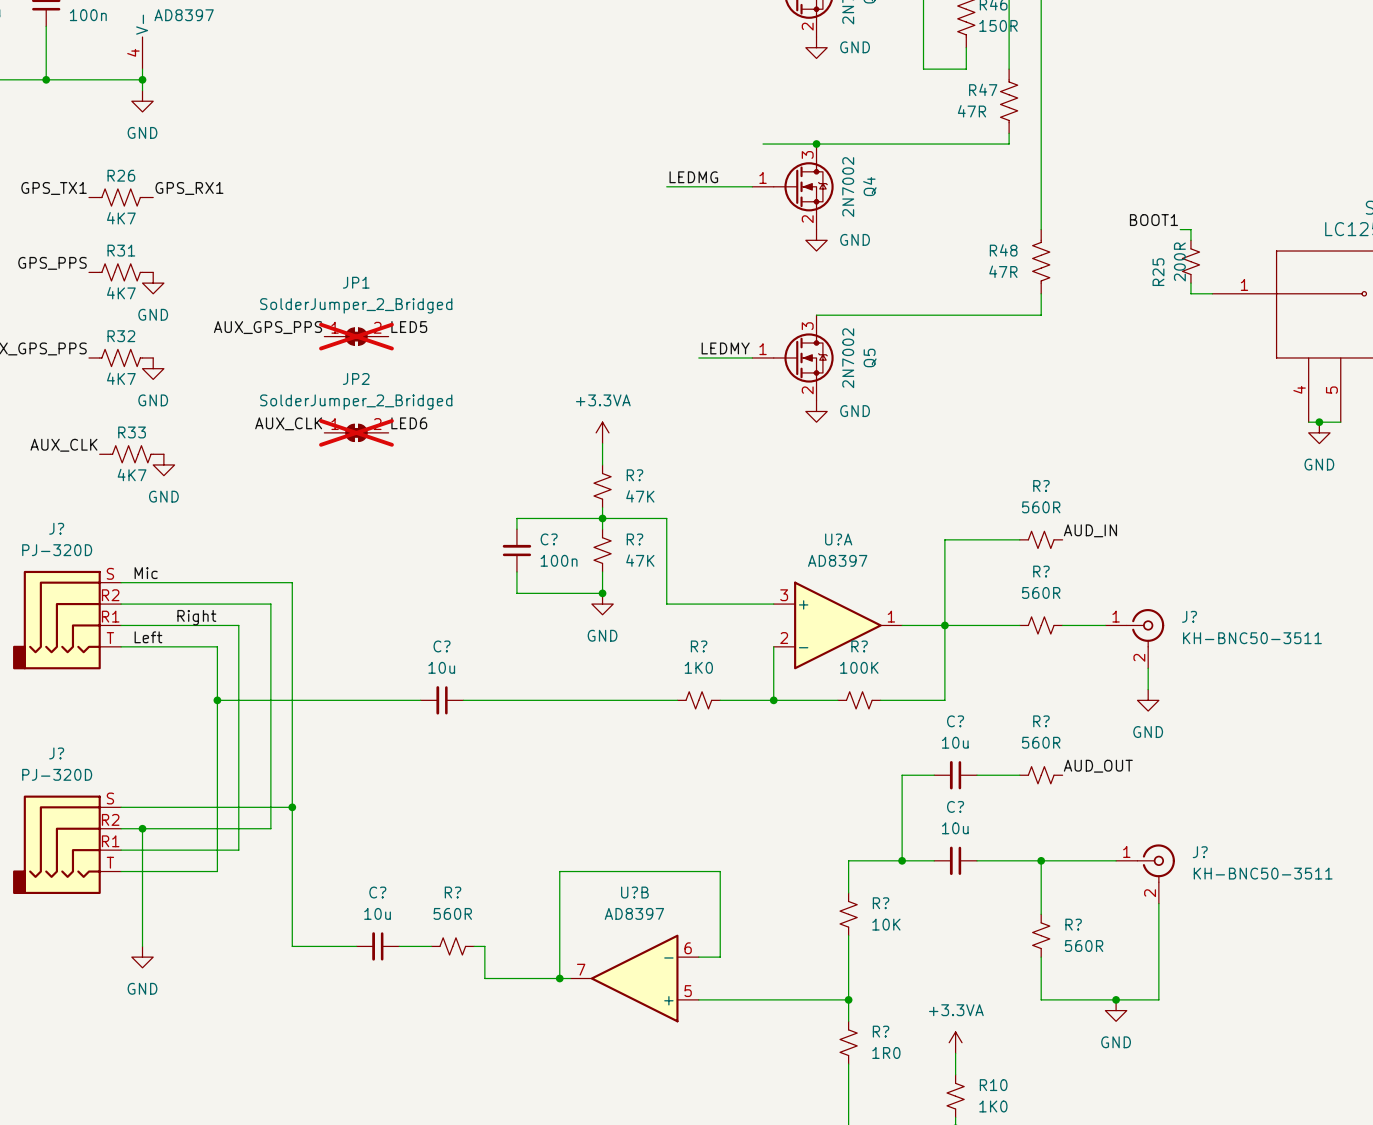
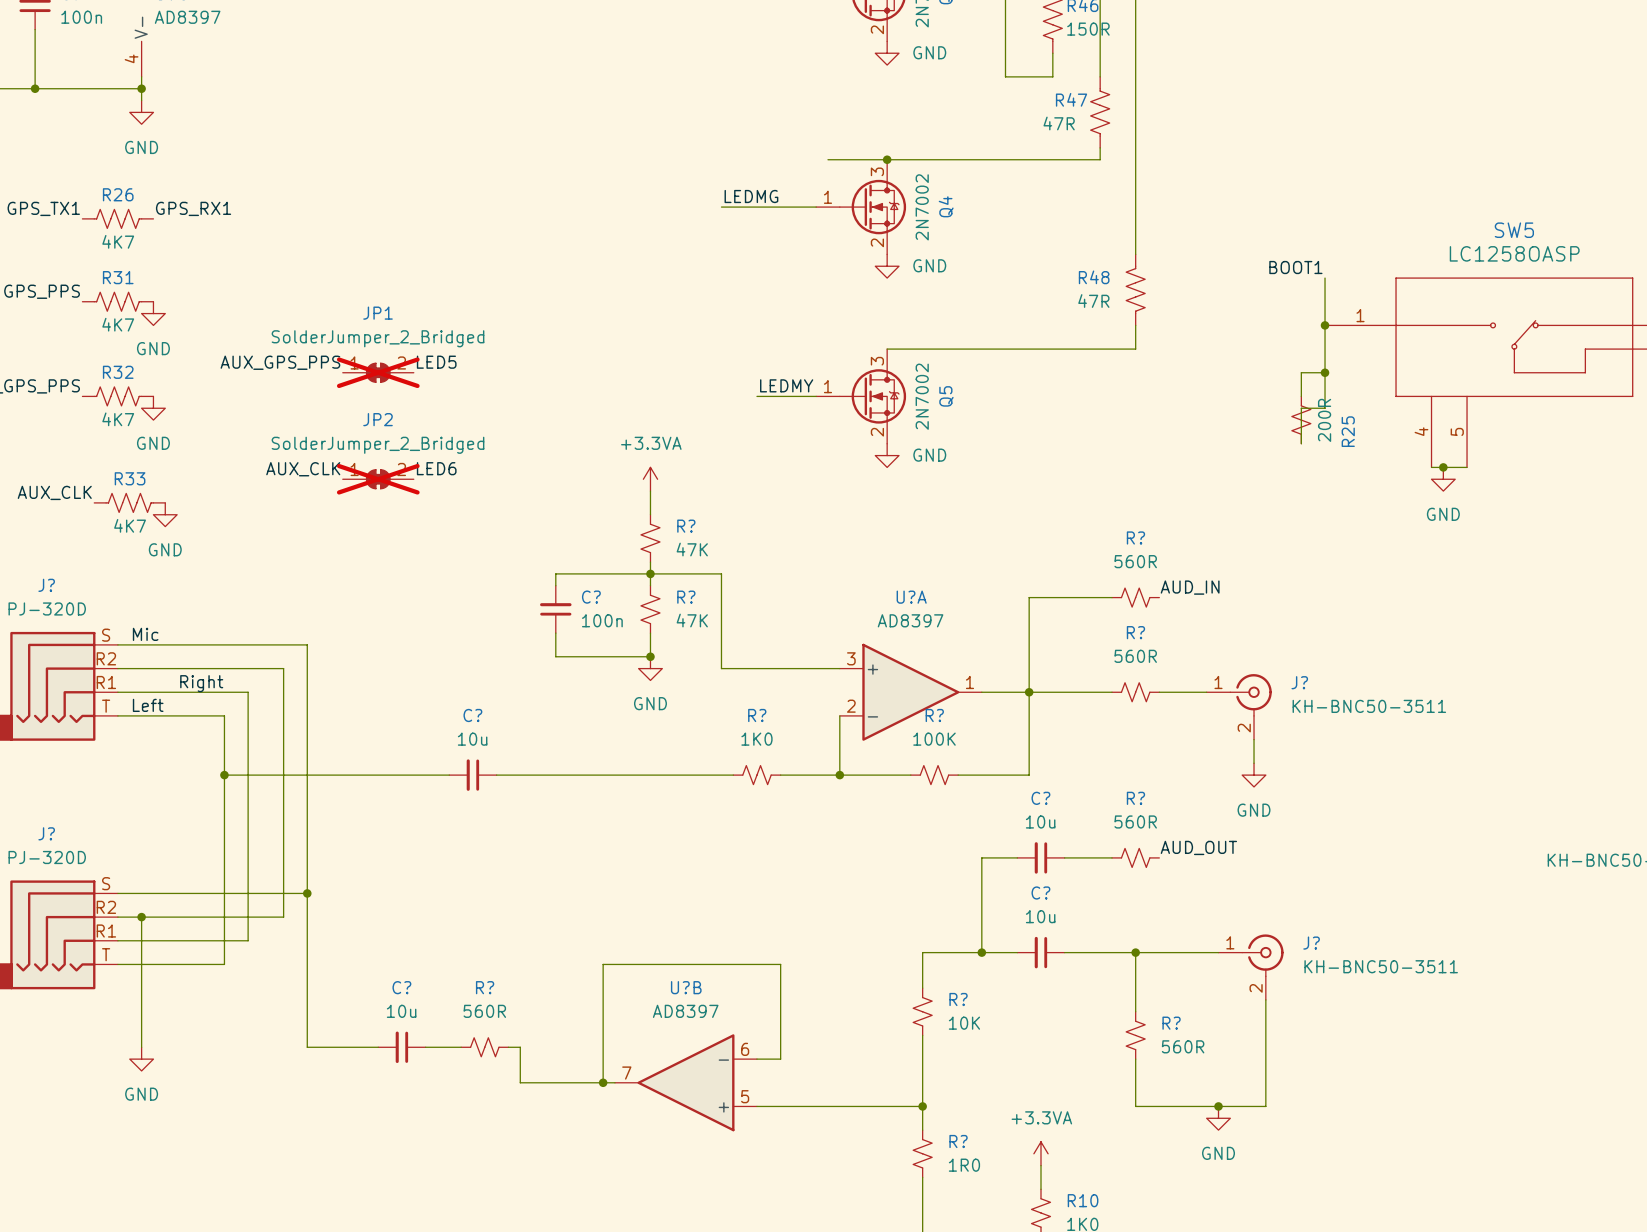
label position: BOOT1 (1153, 220) -> BOOT1 (1295, 267)
wire: (1180, 229) (1190, 229) (1190, 240) -> none
wire: none -> (1325, 278) (1325, 408) (1301, 408) (1301, 443)
R25 value position: 200R (1179, 261) -> 200R (1324, 420)
R25 position: (1190, 261) -> (1301, 420)
R25 name position: R25 (1158, 272) -> R25 (1348, 431)
wire: (1190, 283) (1190, 293) (1212, 293) -> none
junction: none -> (1325, 325)
wire: none -> (1325, 372) (1301, 372) (1301, 396)
junction: none -> (1325, 372)

